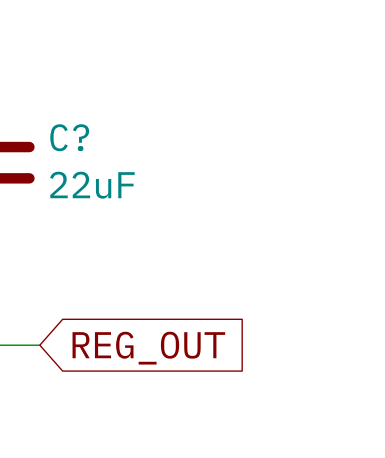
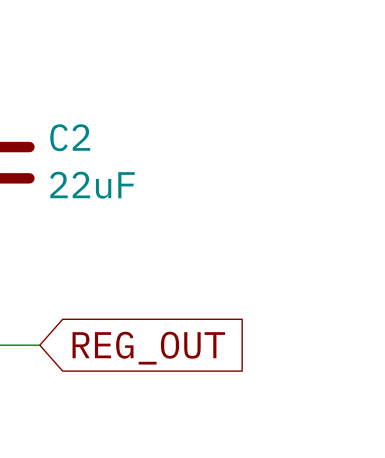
C? name: C? (69, 137) -> C2 (70, 137)

